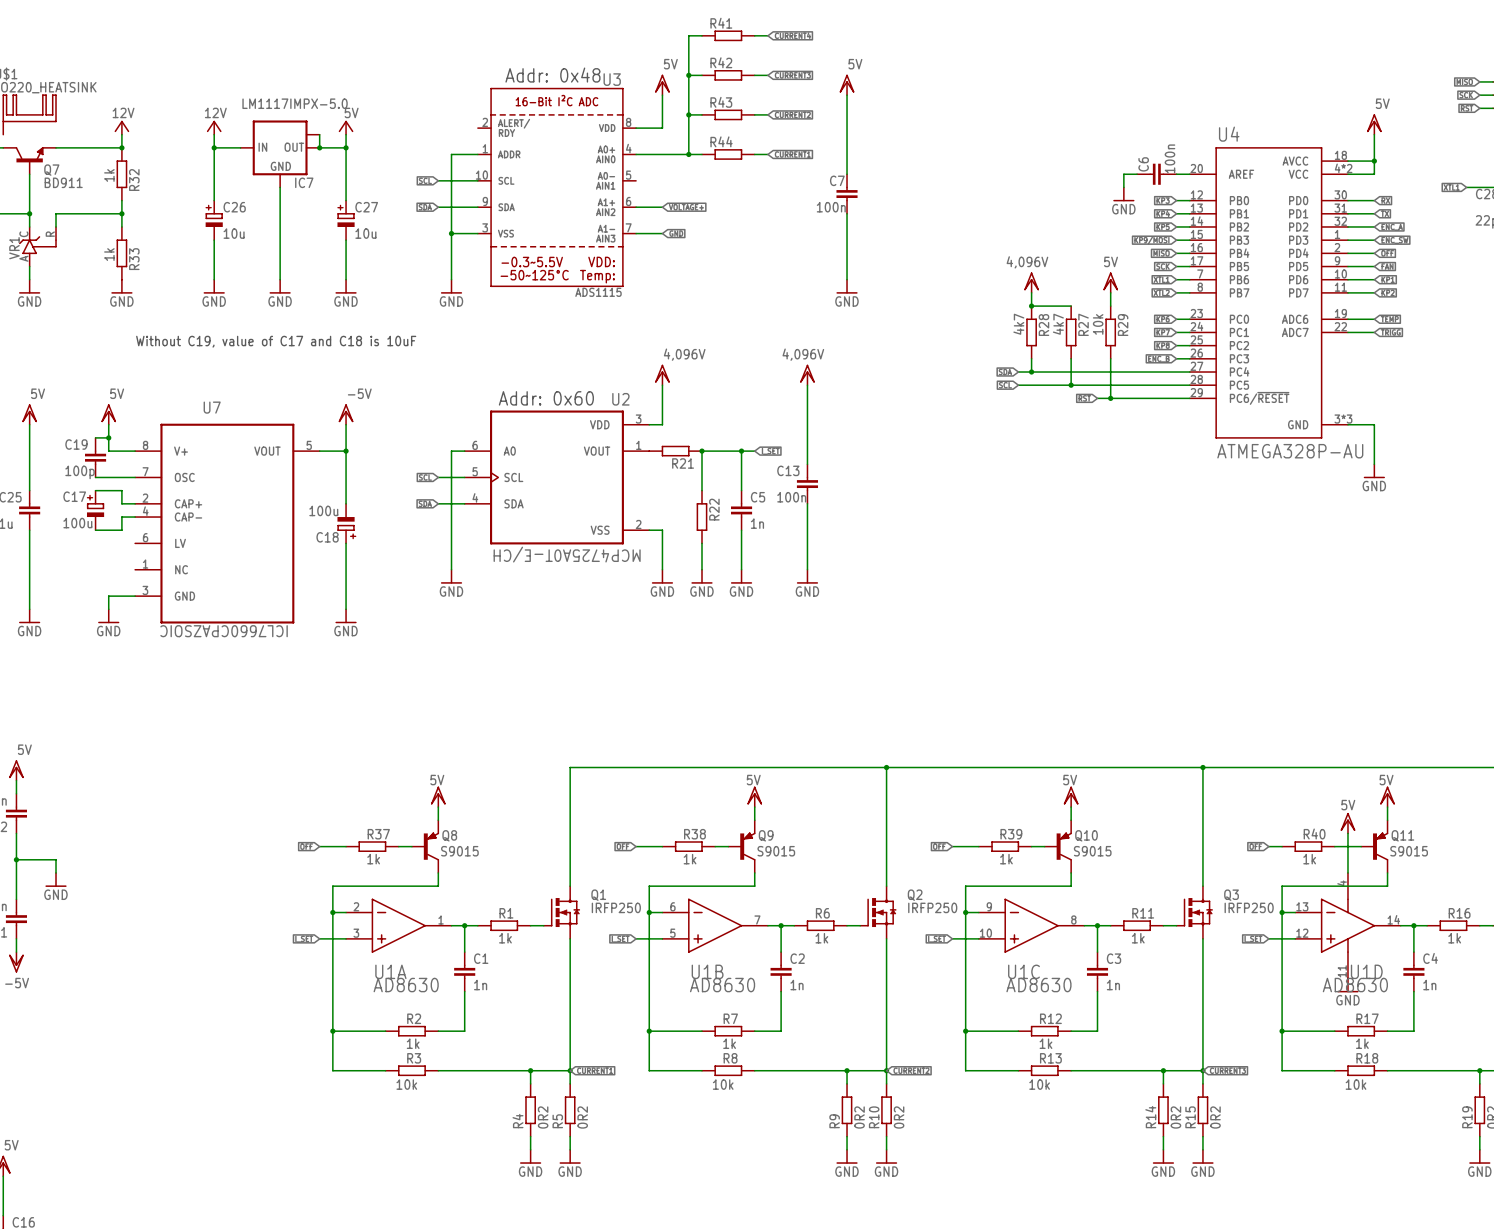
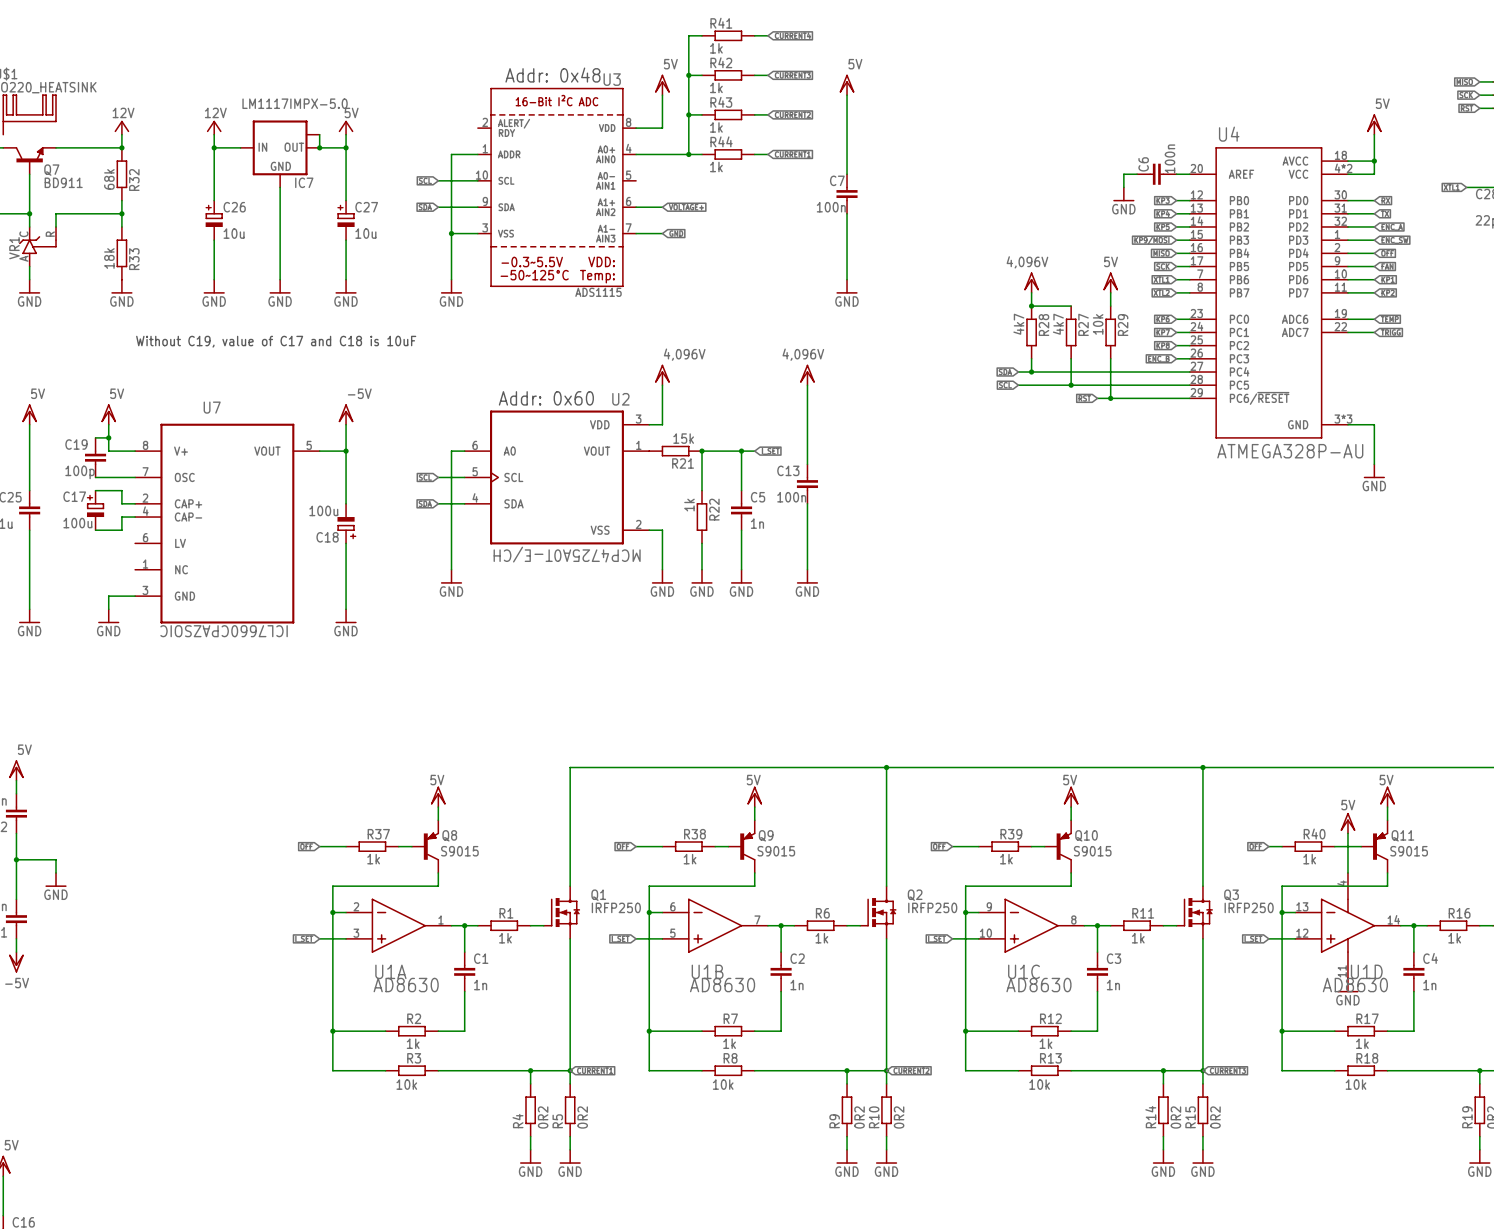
R41 value: none -> 1k (716, 48)
R42 value: none -> 1k (716, 87)
R43 value: none -> 1k (716, 127)
R44 value: none -> 1k (716, 167)
R32 value: 1k (109, 175) -> 68k (109, 179)
R33 value: 1k (109, 254) -> 18k (109, 258)
R21 value: none -> 15k (683, 438)
R22 value: none -> 1k (689, 505)

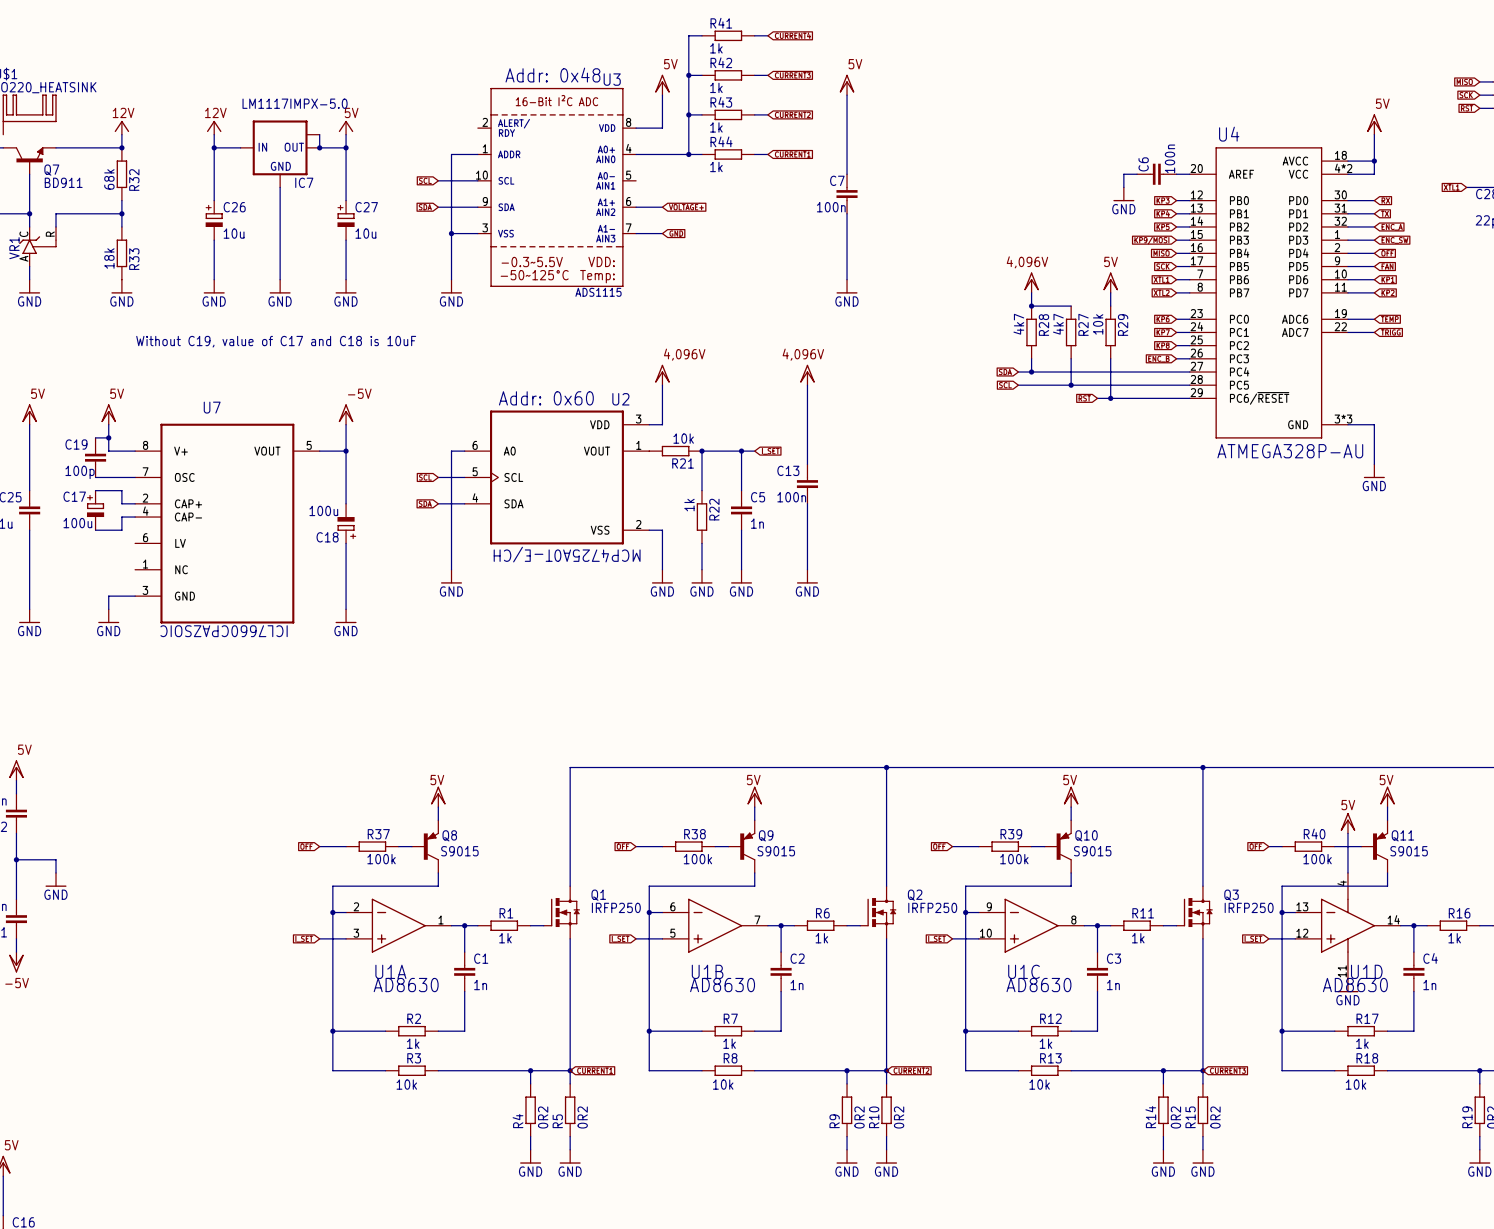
R21 value: 15k (683, 438) -> 10k (683, 438)
R37 value: 1k (373, 859) -> 100k (381, 859)
R38 value: 1k (690, 859) -> 100k (697, 859)
R39 value: 1k (1006, 859) -> 100k (1014, 859)
R40 value: 1k (1309, 859) -> 100k (1317, 859)

